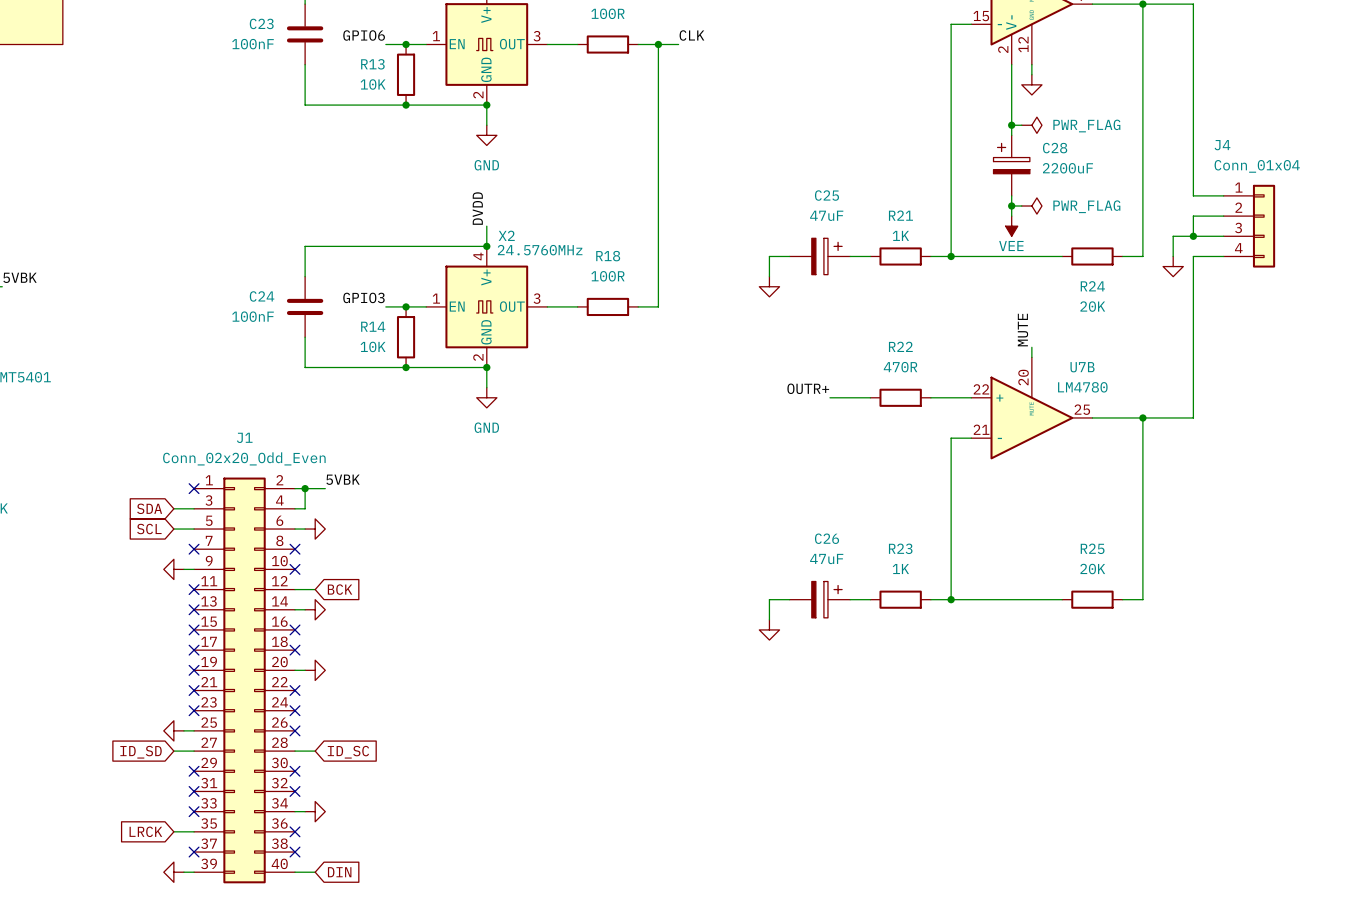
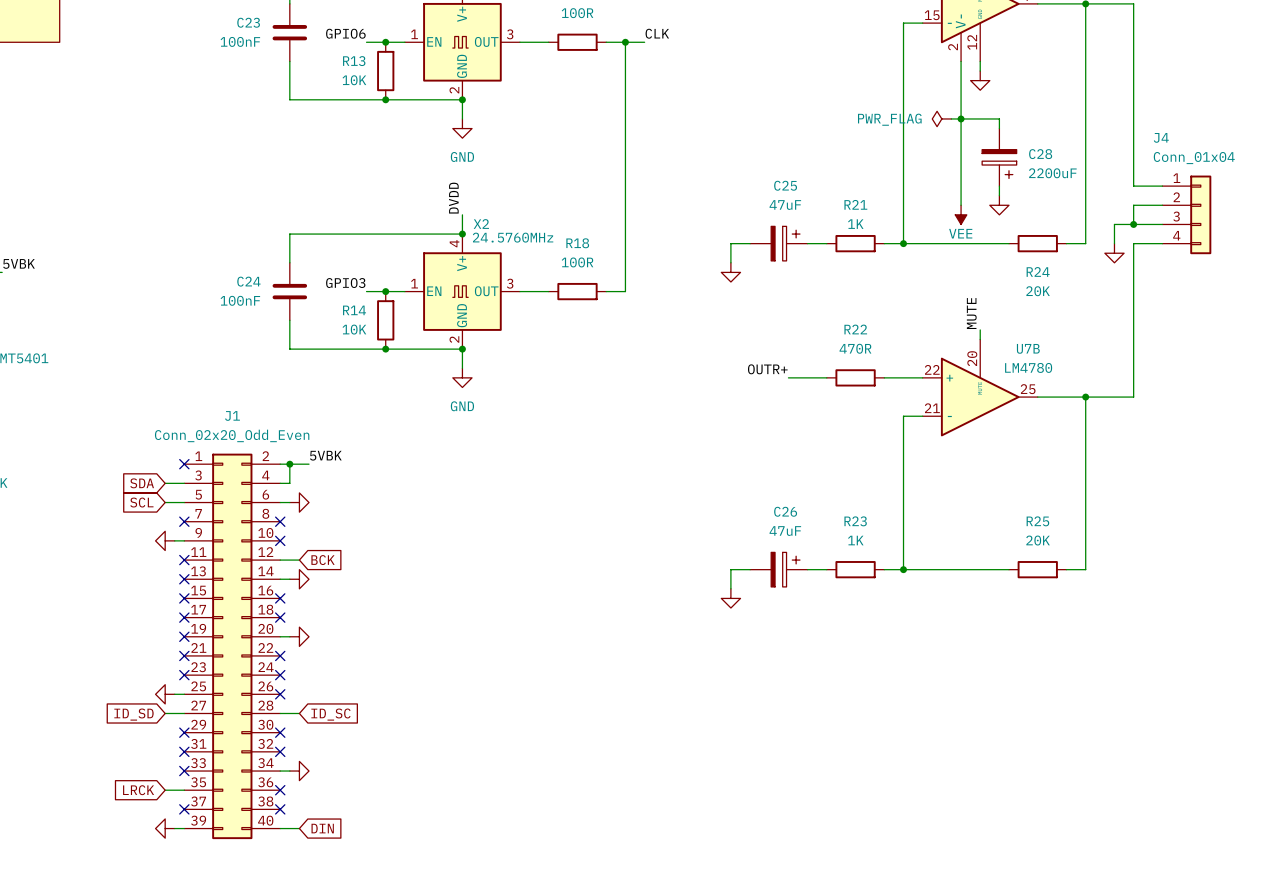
wire: none -> (970, 118) (999, 118) (999, 128)
power symbol rotation: 0° (1031, 125) -> 180° (941, 118)
power symbol position: PWR_FLAG (1031, 125) -> PWR_FLAG (941, 118)
C28 rotation: 0° (1011, 158) -> 180° (999, 164)
C28 position: (1011, 165) -> (999, 157)
wire: none -> (999, 186) (999, 195)
wire: (1011, 206) (1021, 206) -> (951, 118) (961, 118)
junction: (1011, 206) -> none
power symbol: PWR_FLAG (1031, 206) -> none
power symbol: none -> (999, 205)

